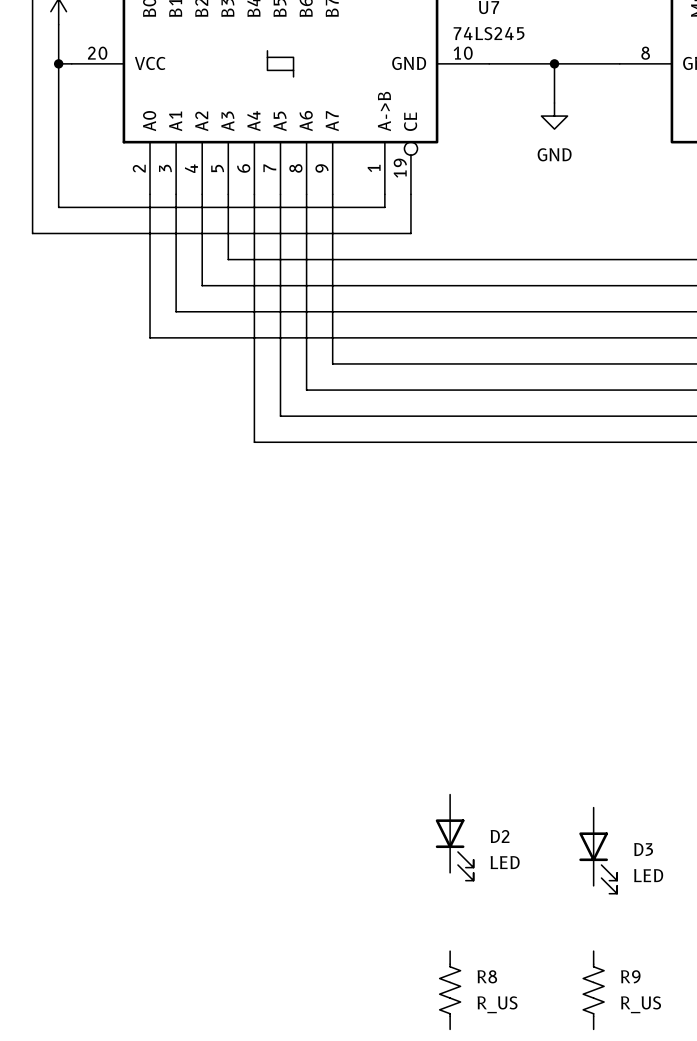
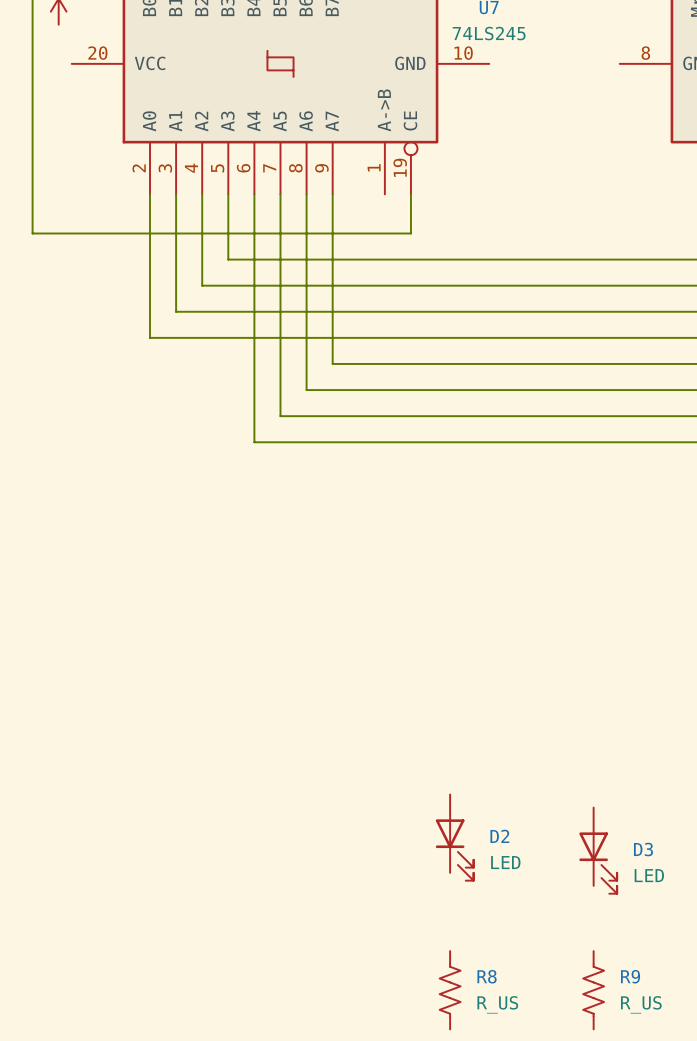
wire: (58, 24) (58, 207) (384, 207) (384, 194) -> none
wire: (58, 63) (71, 63) -> none
junction: (58, 63) -> none
wire: (489, 63) (619, 63) -> none
wire: (554, 63) (554, 103) -> none
junction: (554, 63) -> none
power symbol: GND (554, 116) -> none

